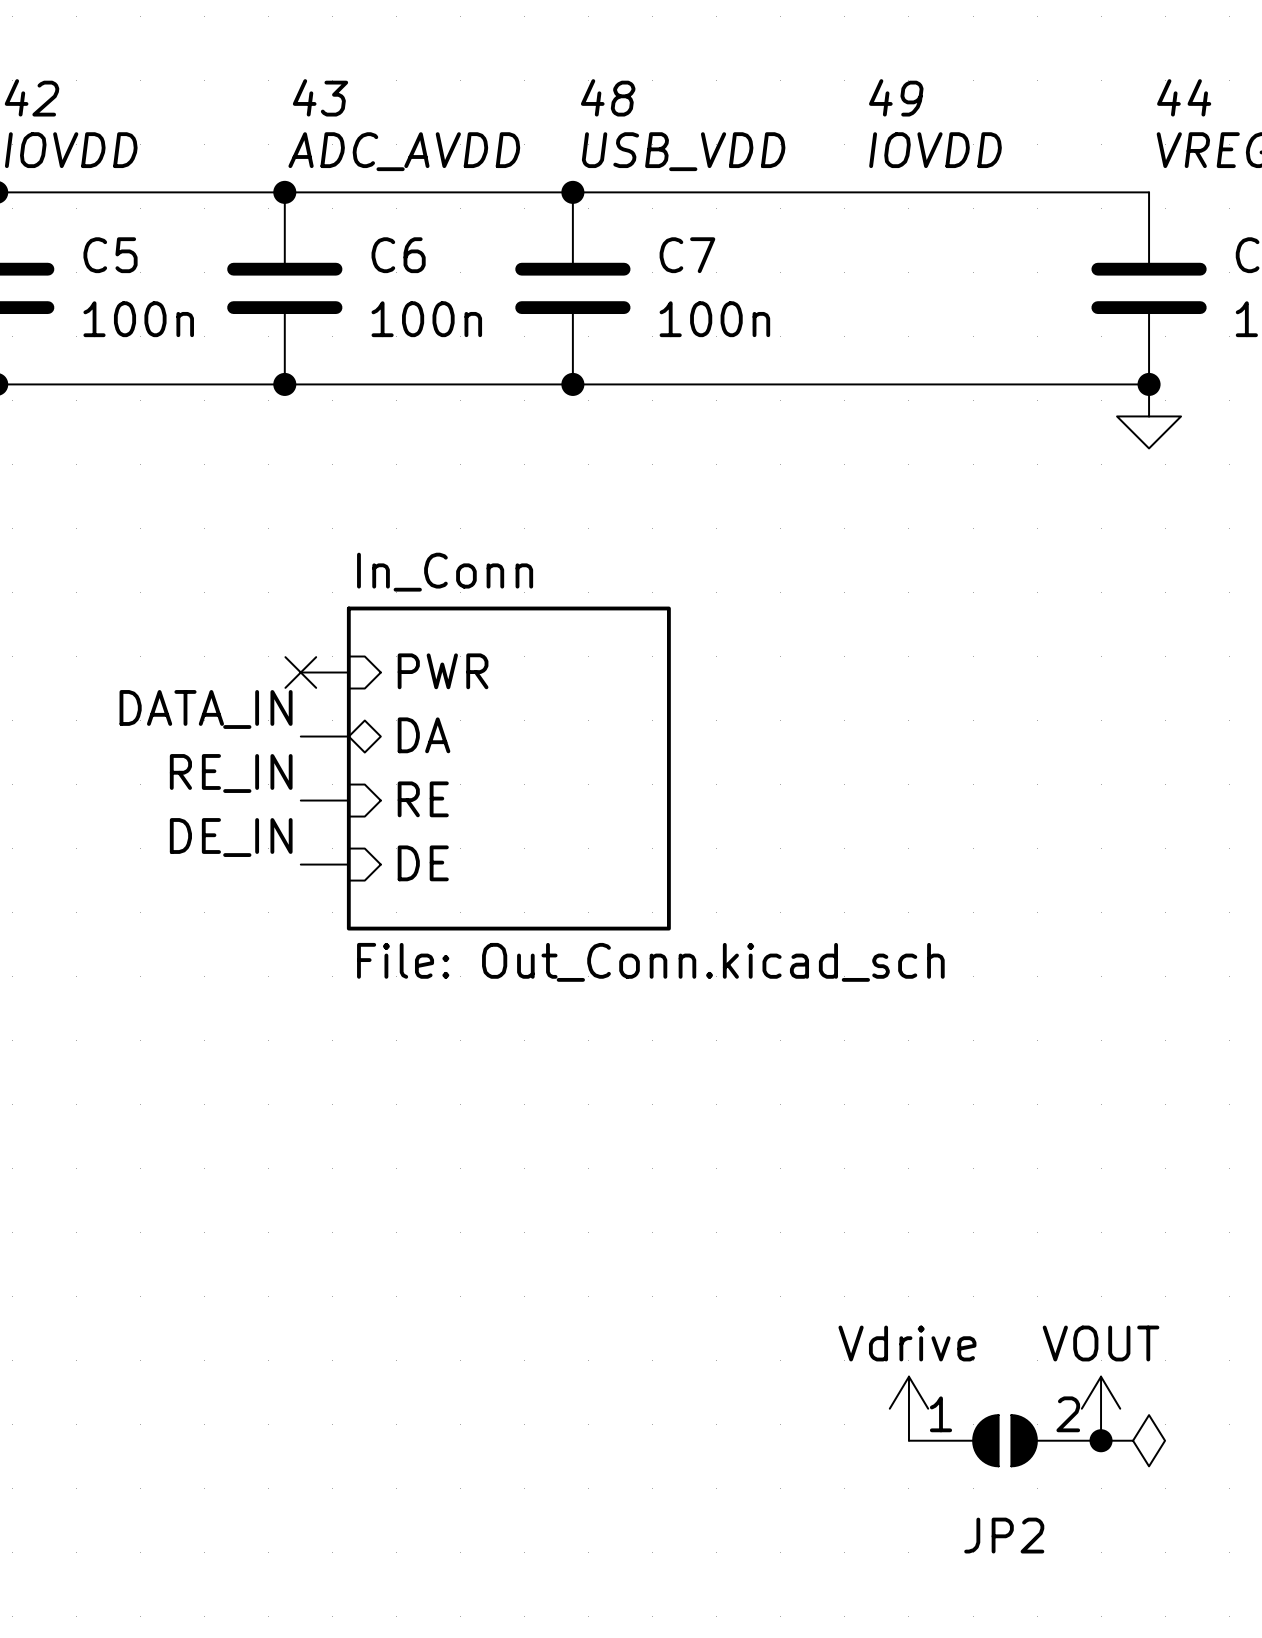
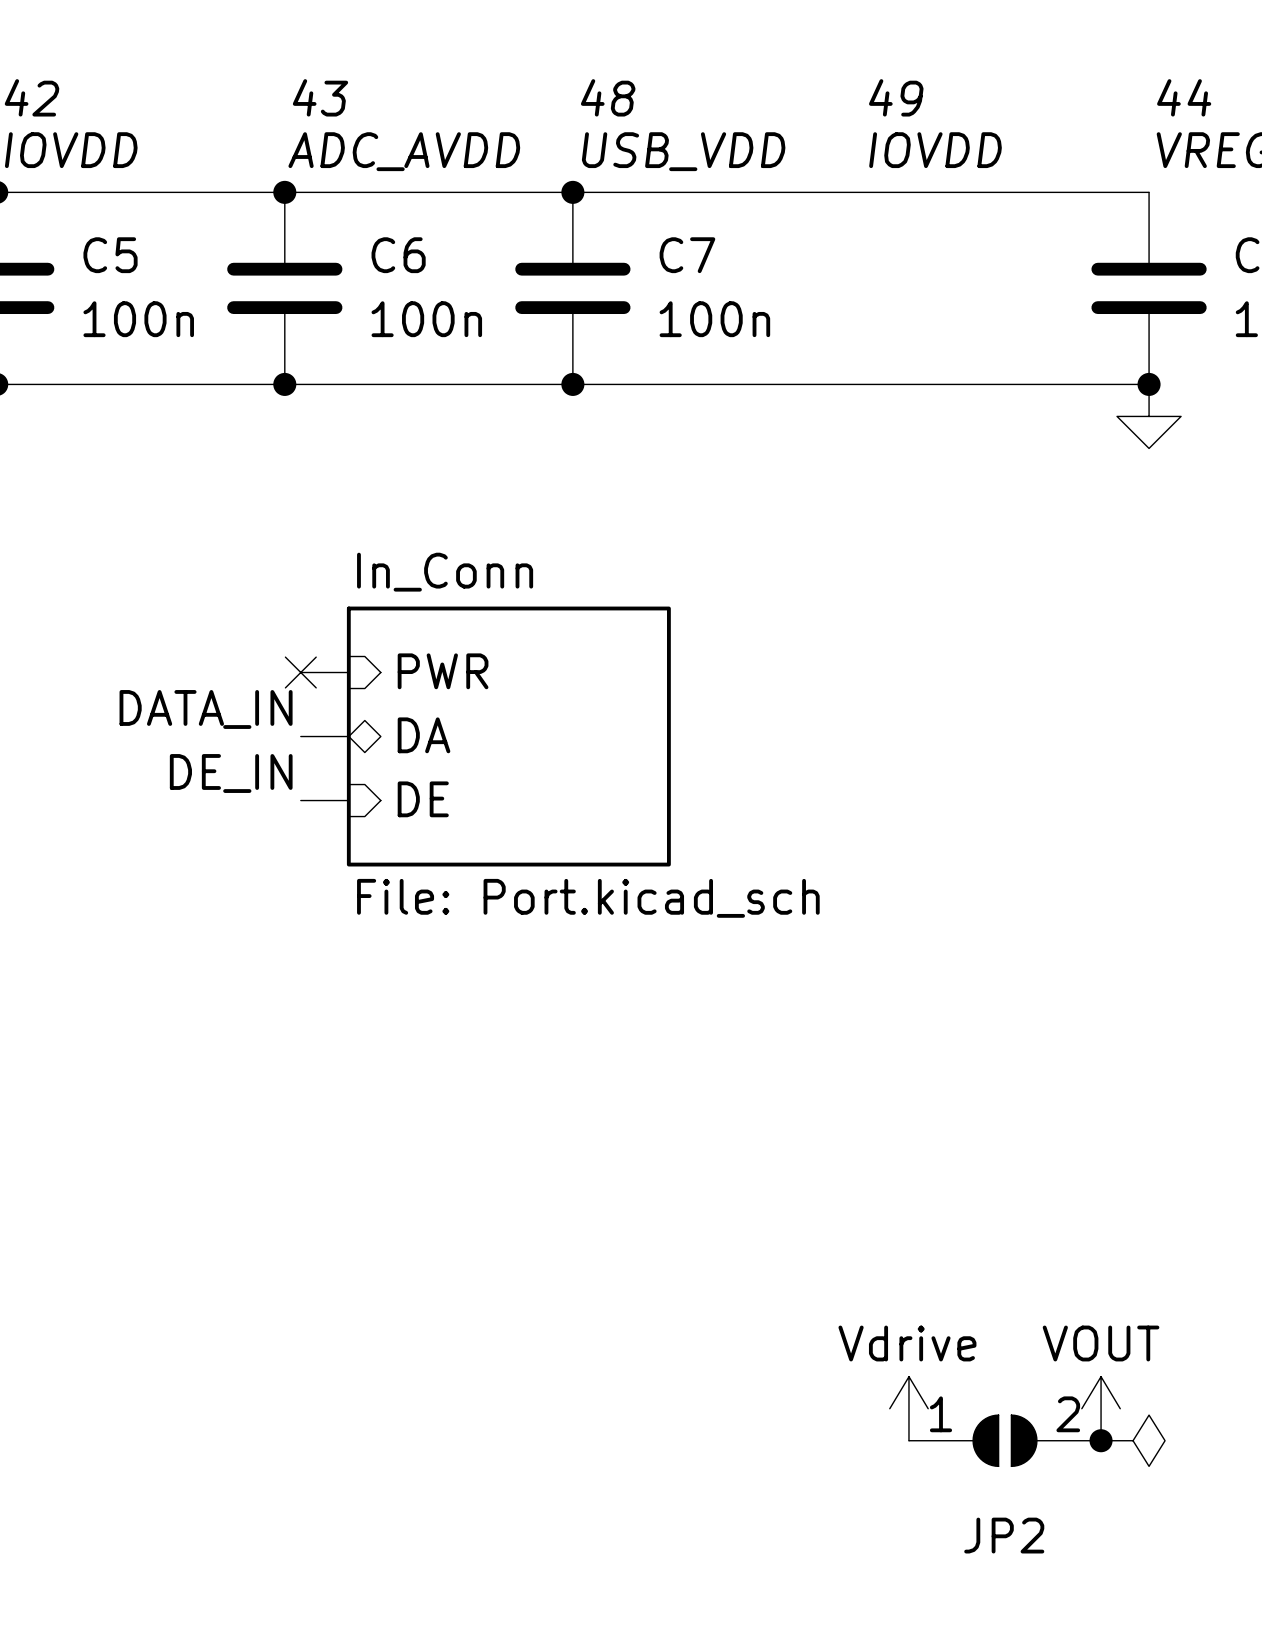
sheet In_Conn: none -> File: Port.kicad_sch (508, 736)
sheet In_Conn: File: Out_Conn.kicad_sch (508, 768) -> none
label: RE_IN (231, 773) -> DE_IN (231, 773)
sheet pin: RE (423, 799) -> DE (423, 799)
label: DE_IN (231, 837) -> none
sheet pin: DE (423, 863) -> none
wire: (300, 864) (348, 864) -> none

